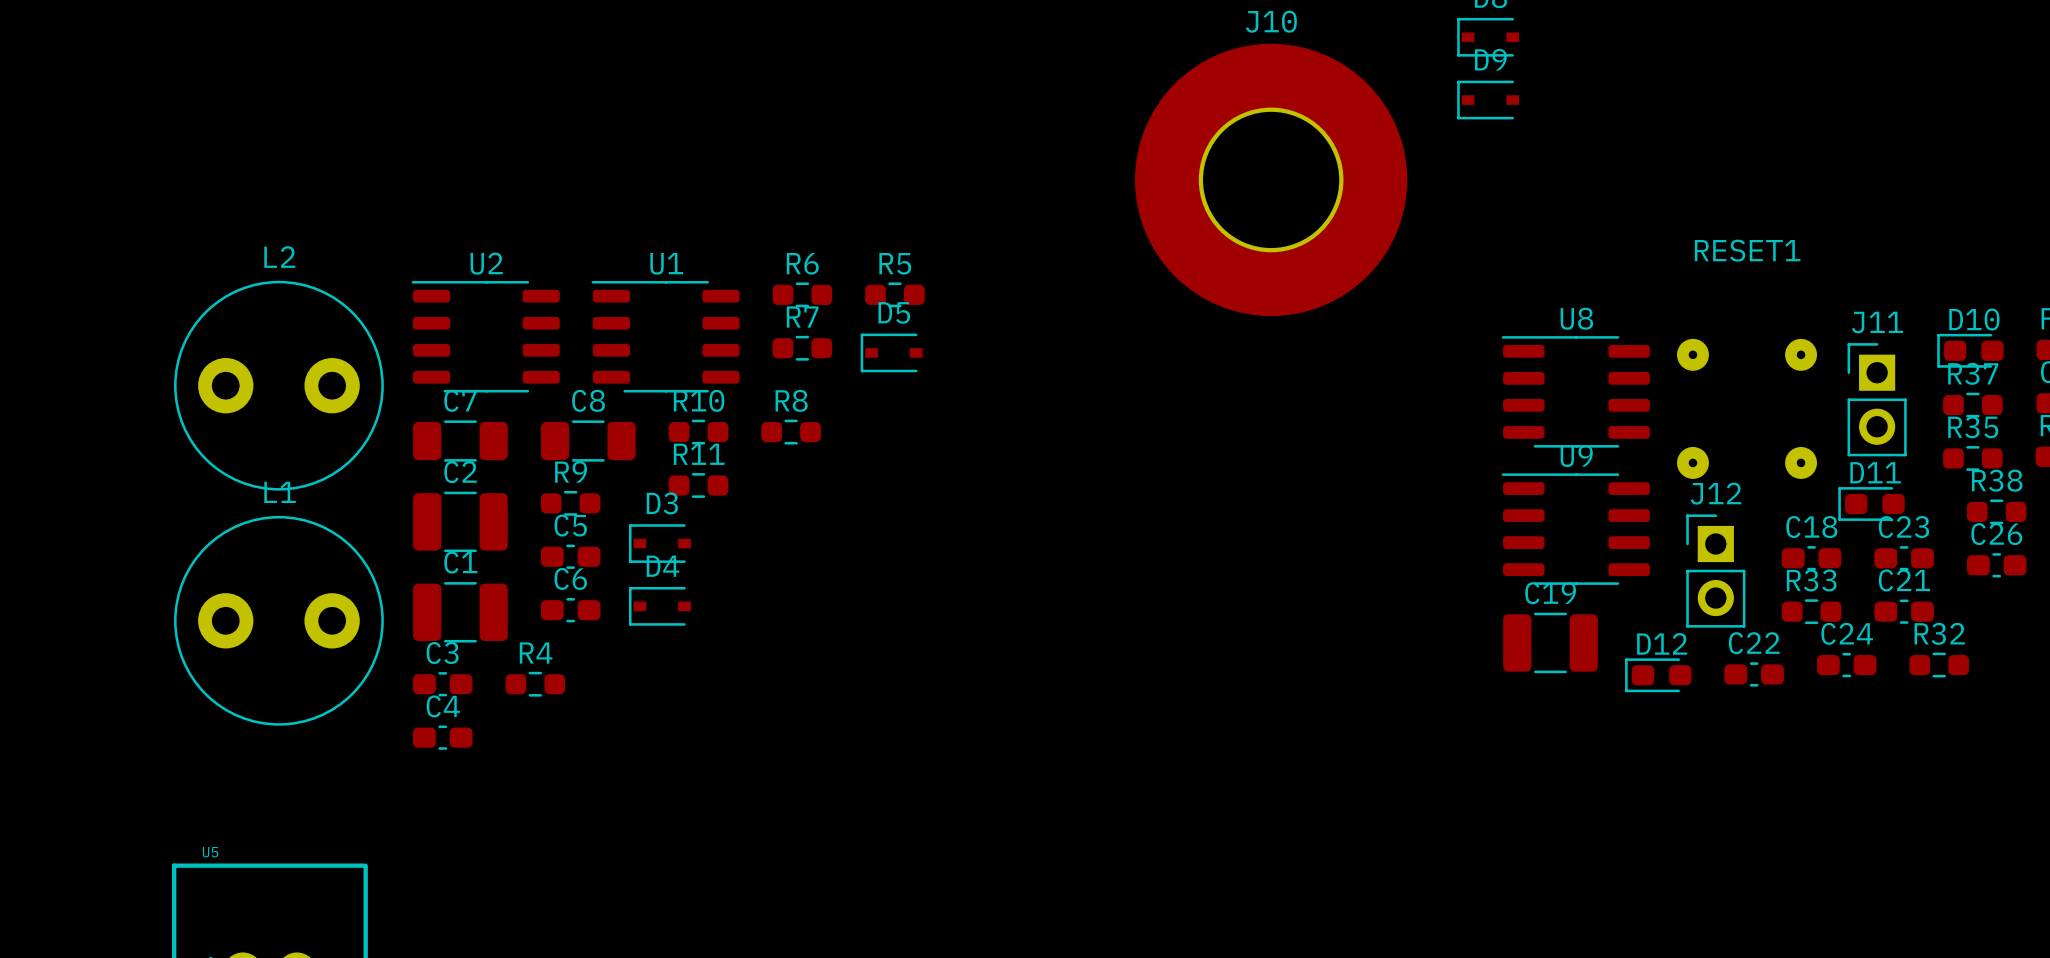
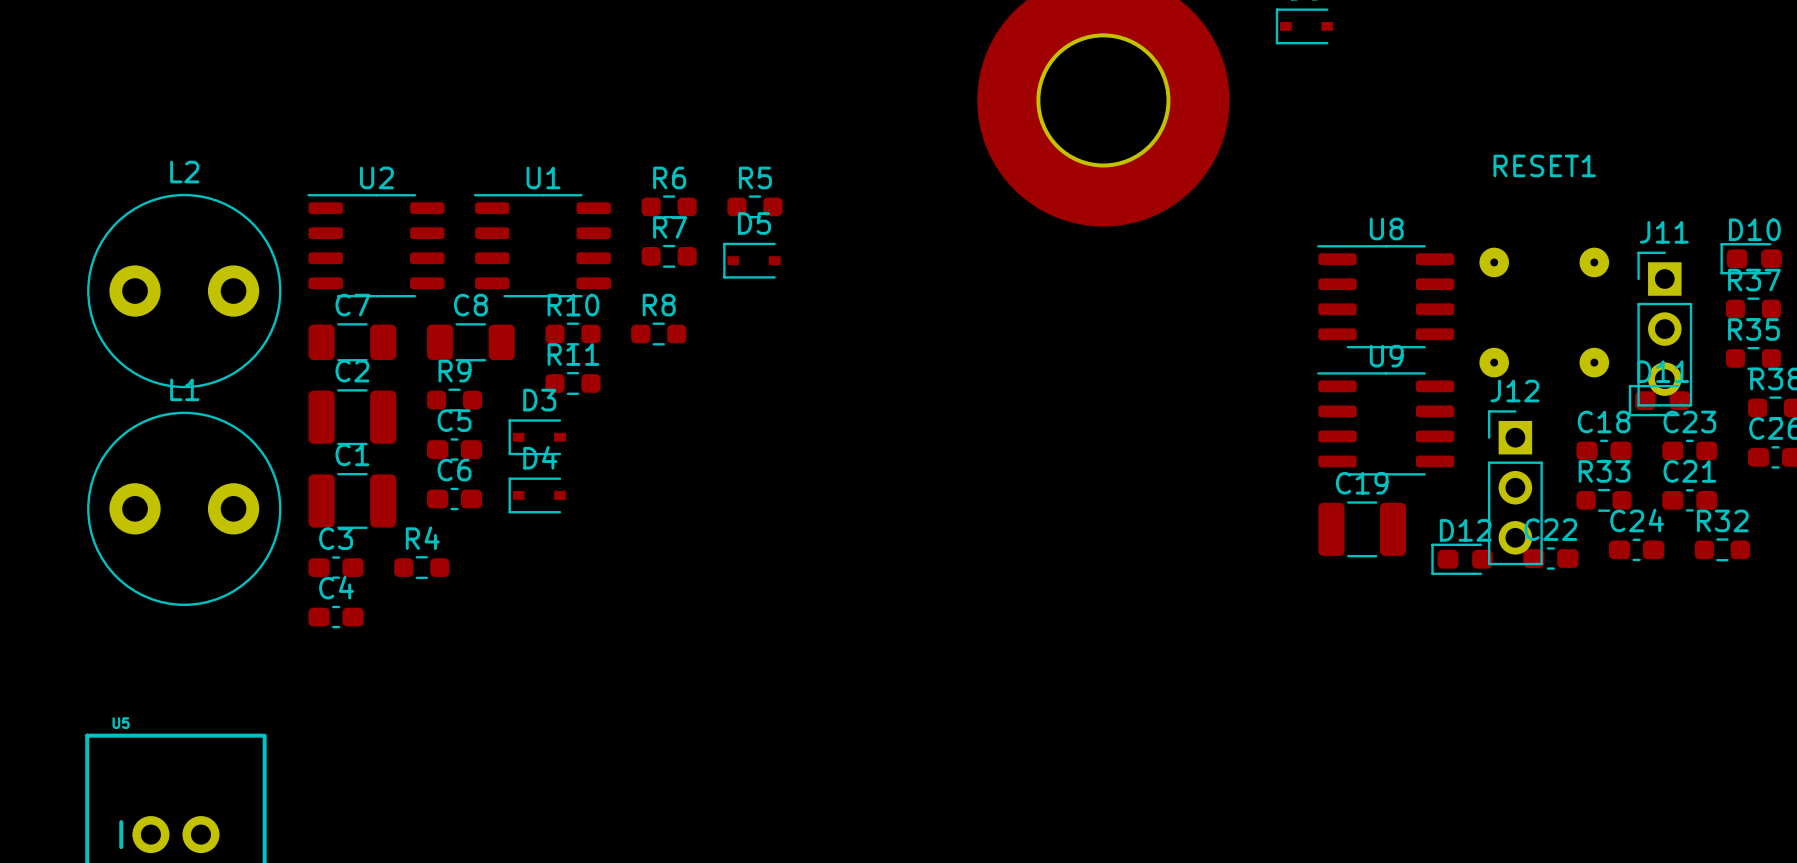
J11 footprint: [1847, 343, 1907, 457] -> [1637, 251, 1693, 407]
J12 footprint: [1686, 514, 1746, 628] -> [1487, 410, 1543, 566]

